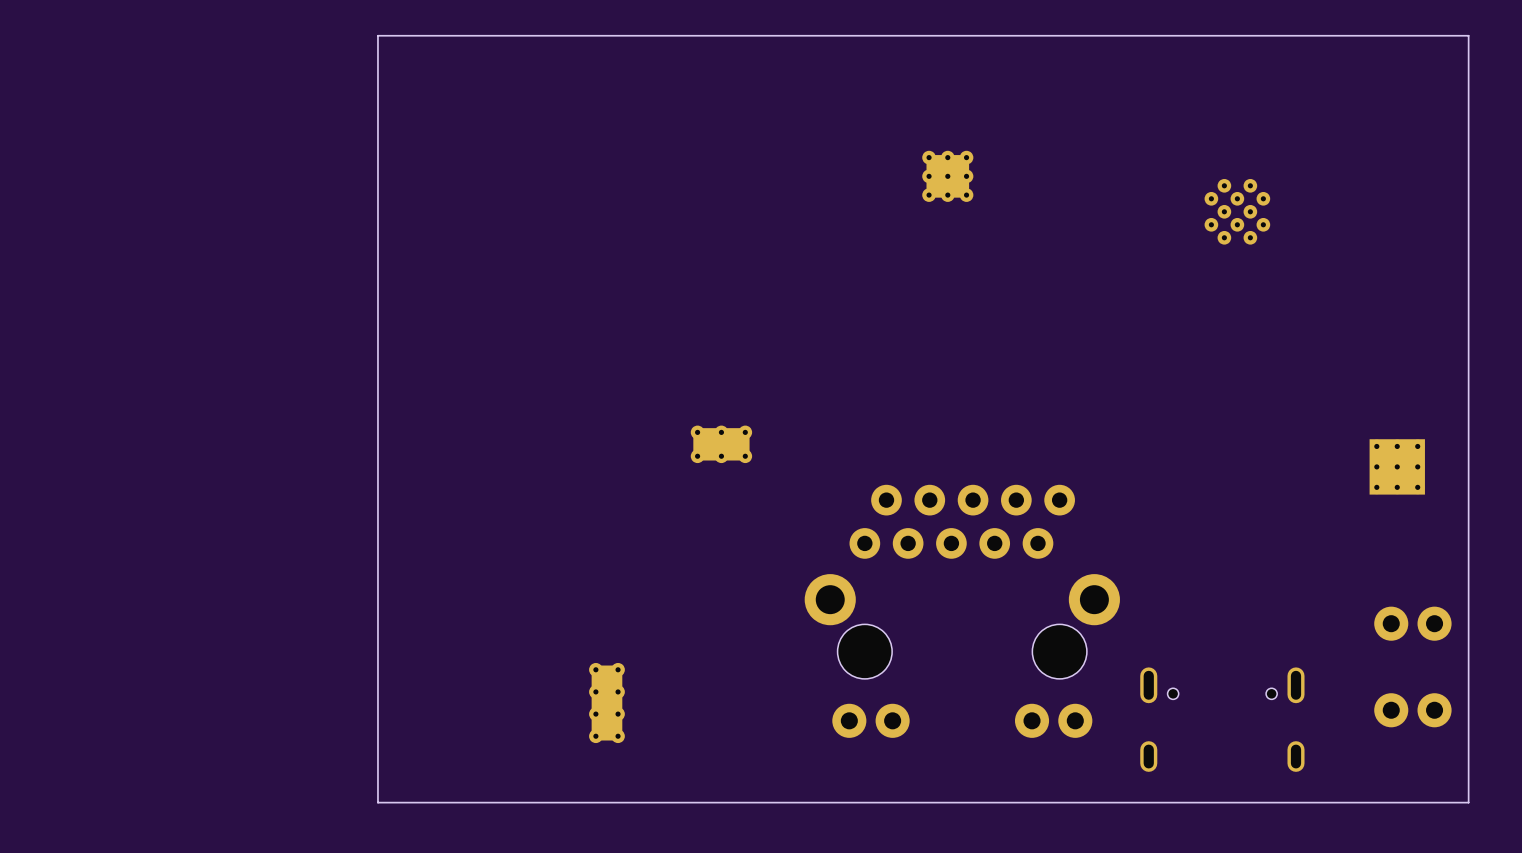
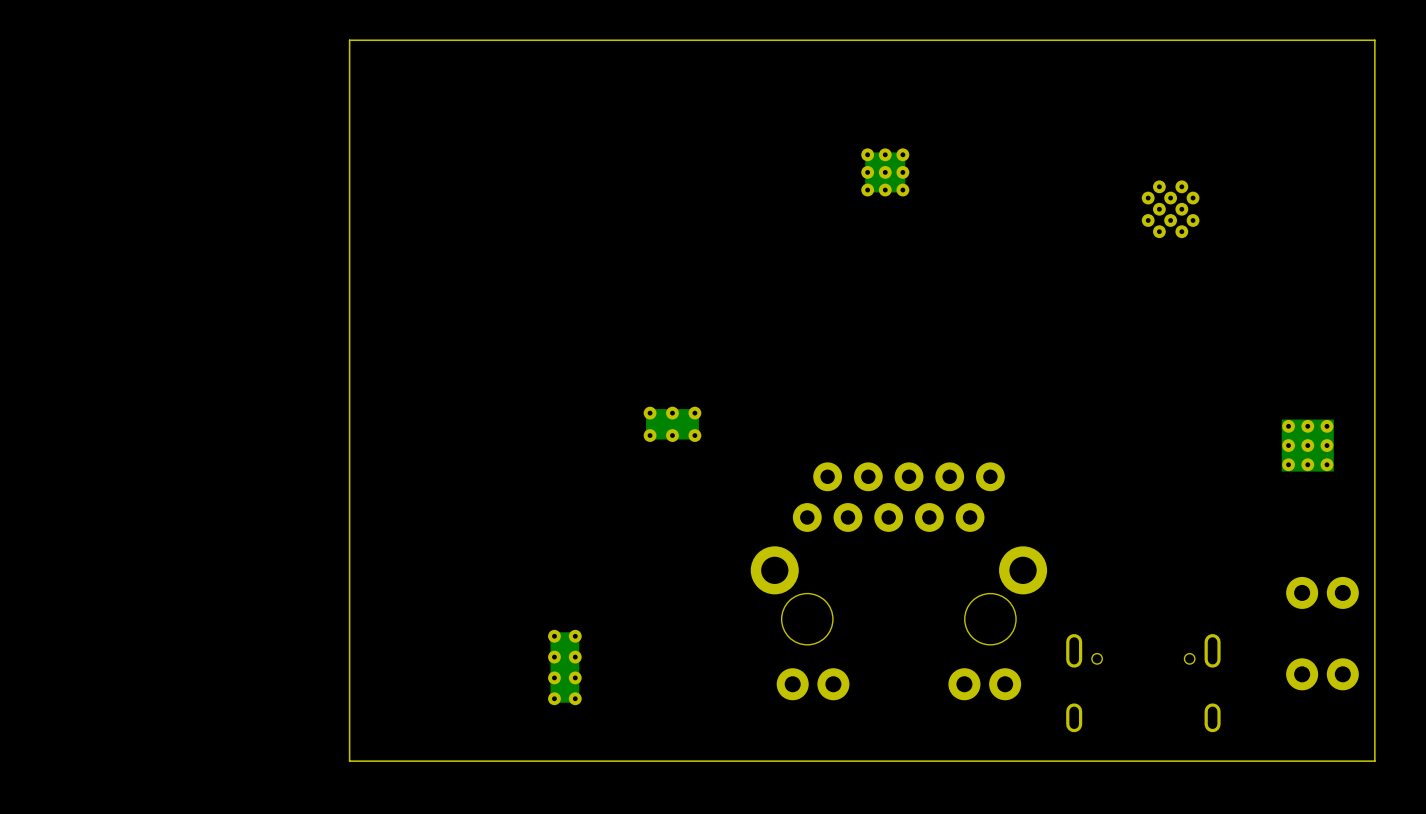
part footprint: [1204, 178, 1271, 245] -> [1141, 180, 1200, 239]

